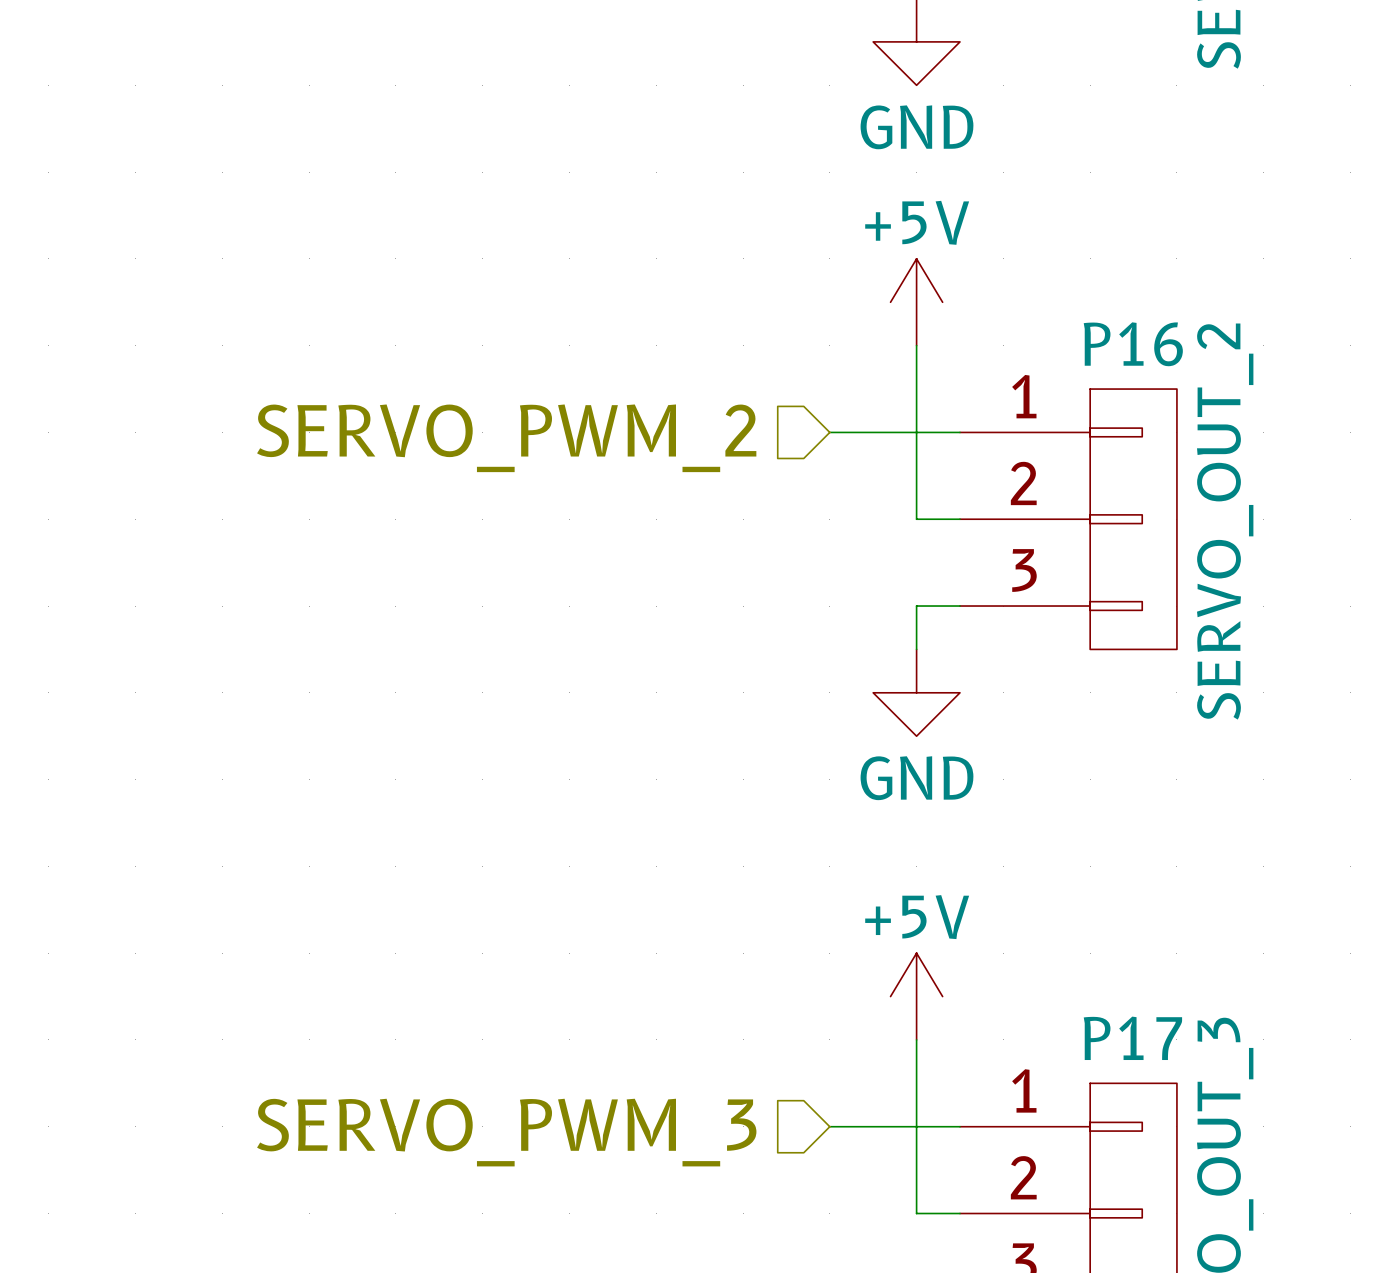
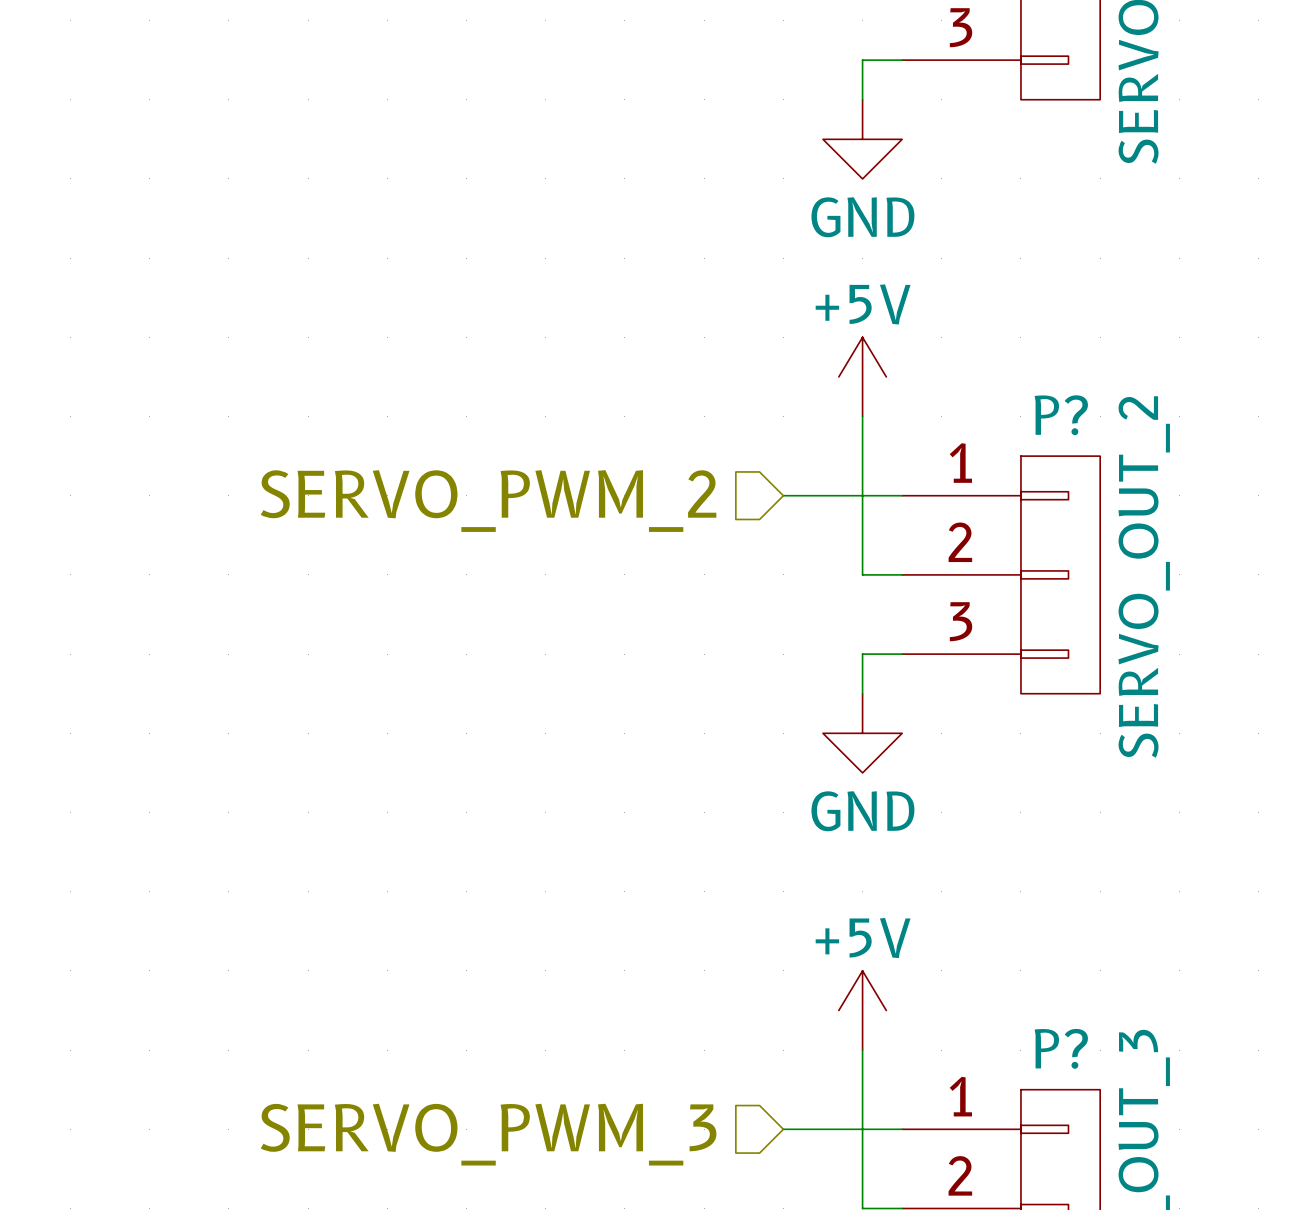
P16 name: P16 (1133, 344) -> P? (1061, 415)
P17 name: P17 (1132, 1038) -> P? (1061, 1048)

